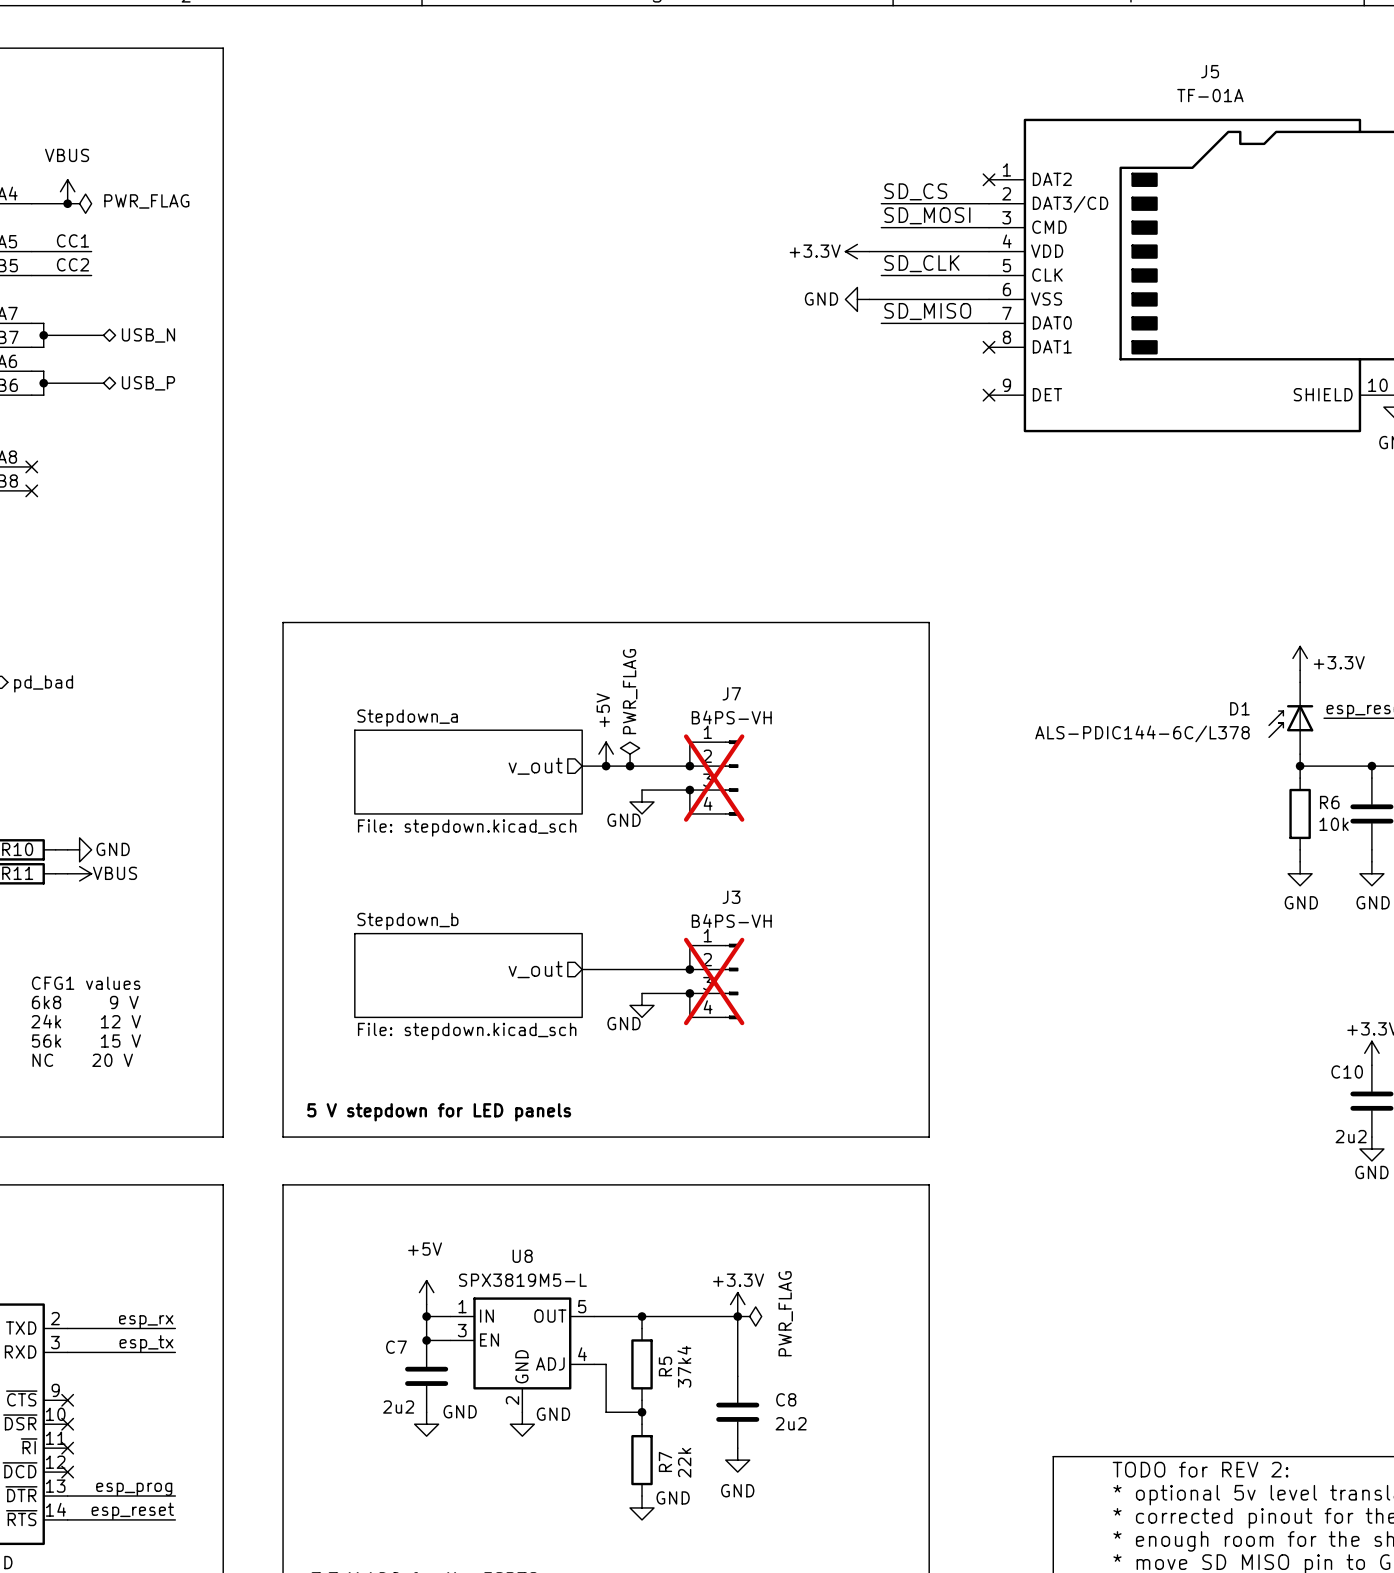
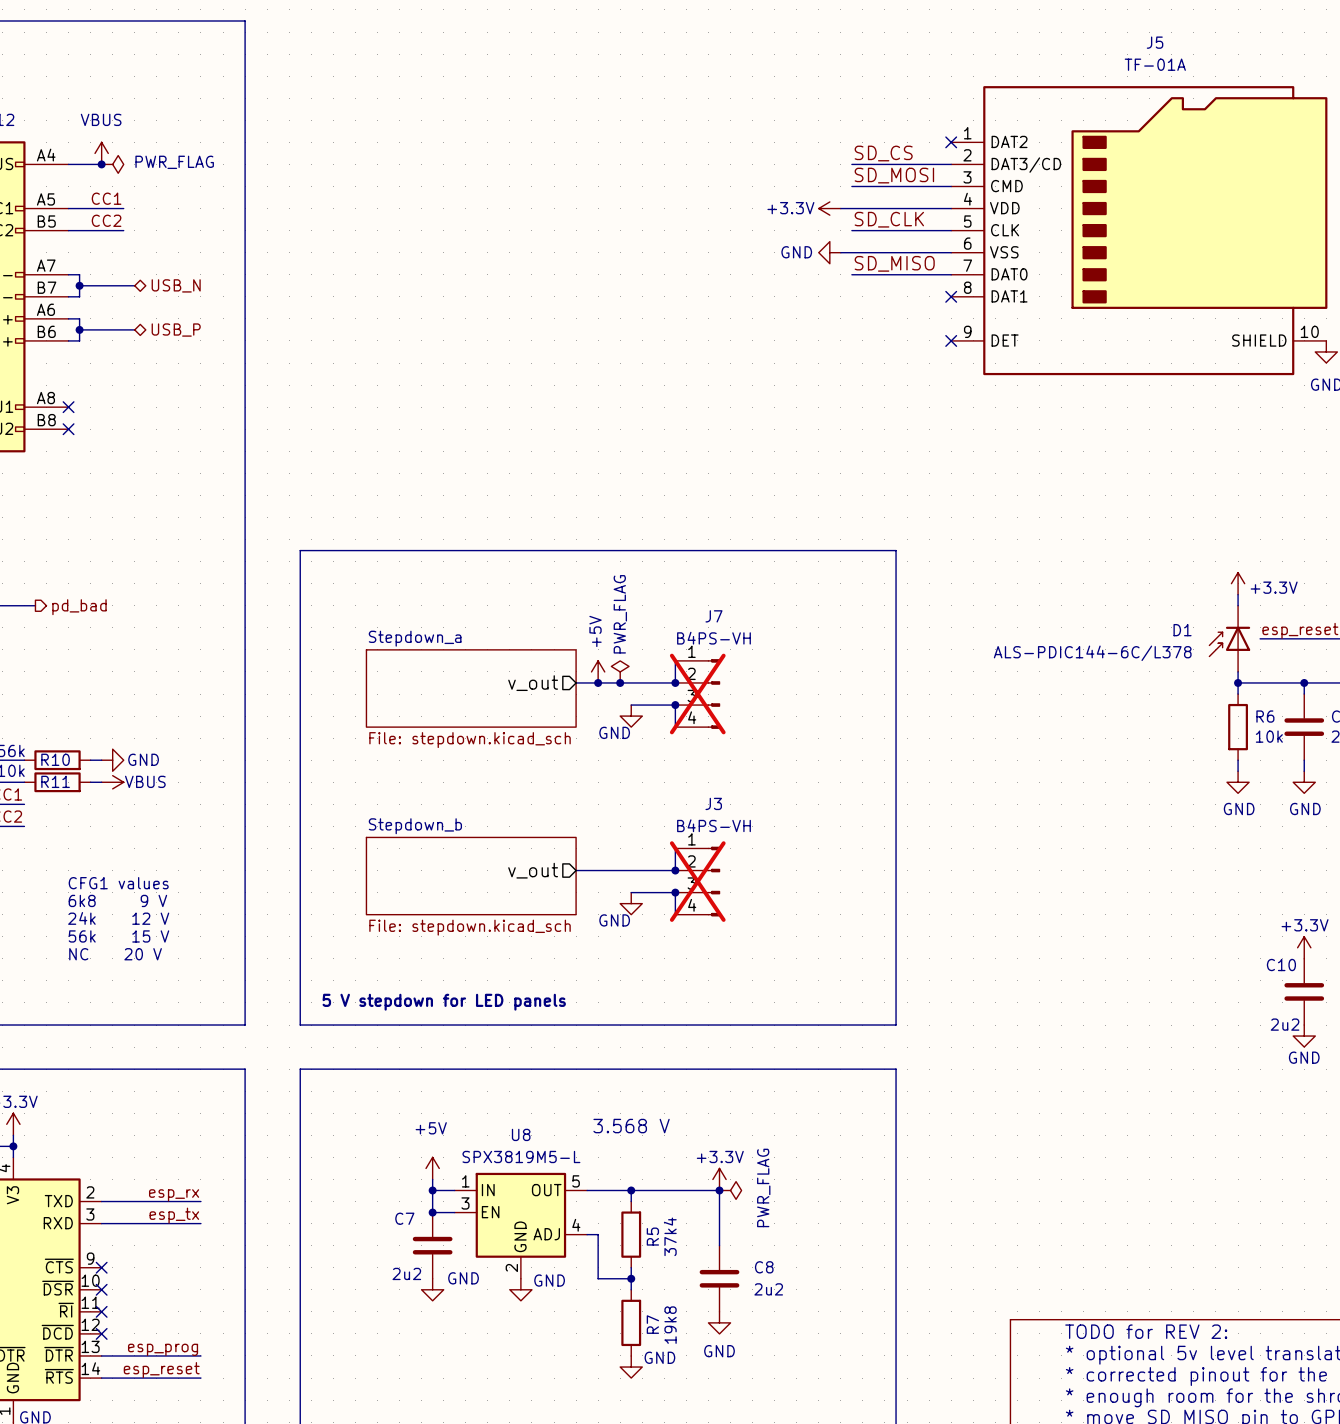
text: none -> 3.568 V (631, 1126)
R7 value: 22k (684, 1462) -> 19k8 (670, 1325)

